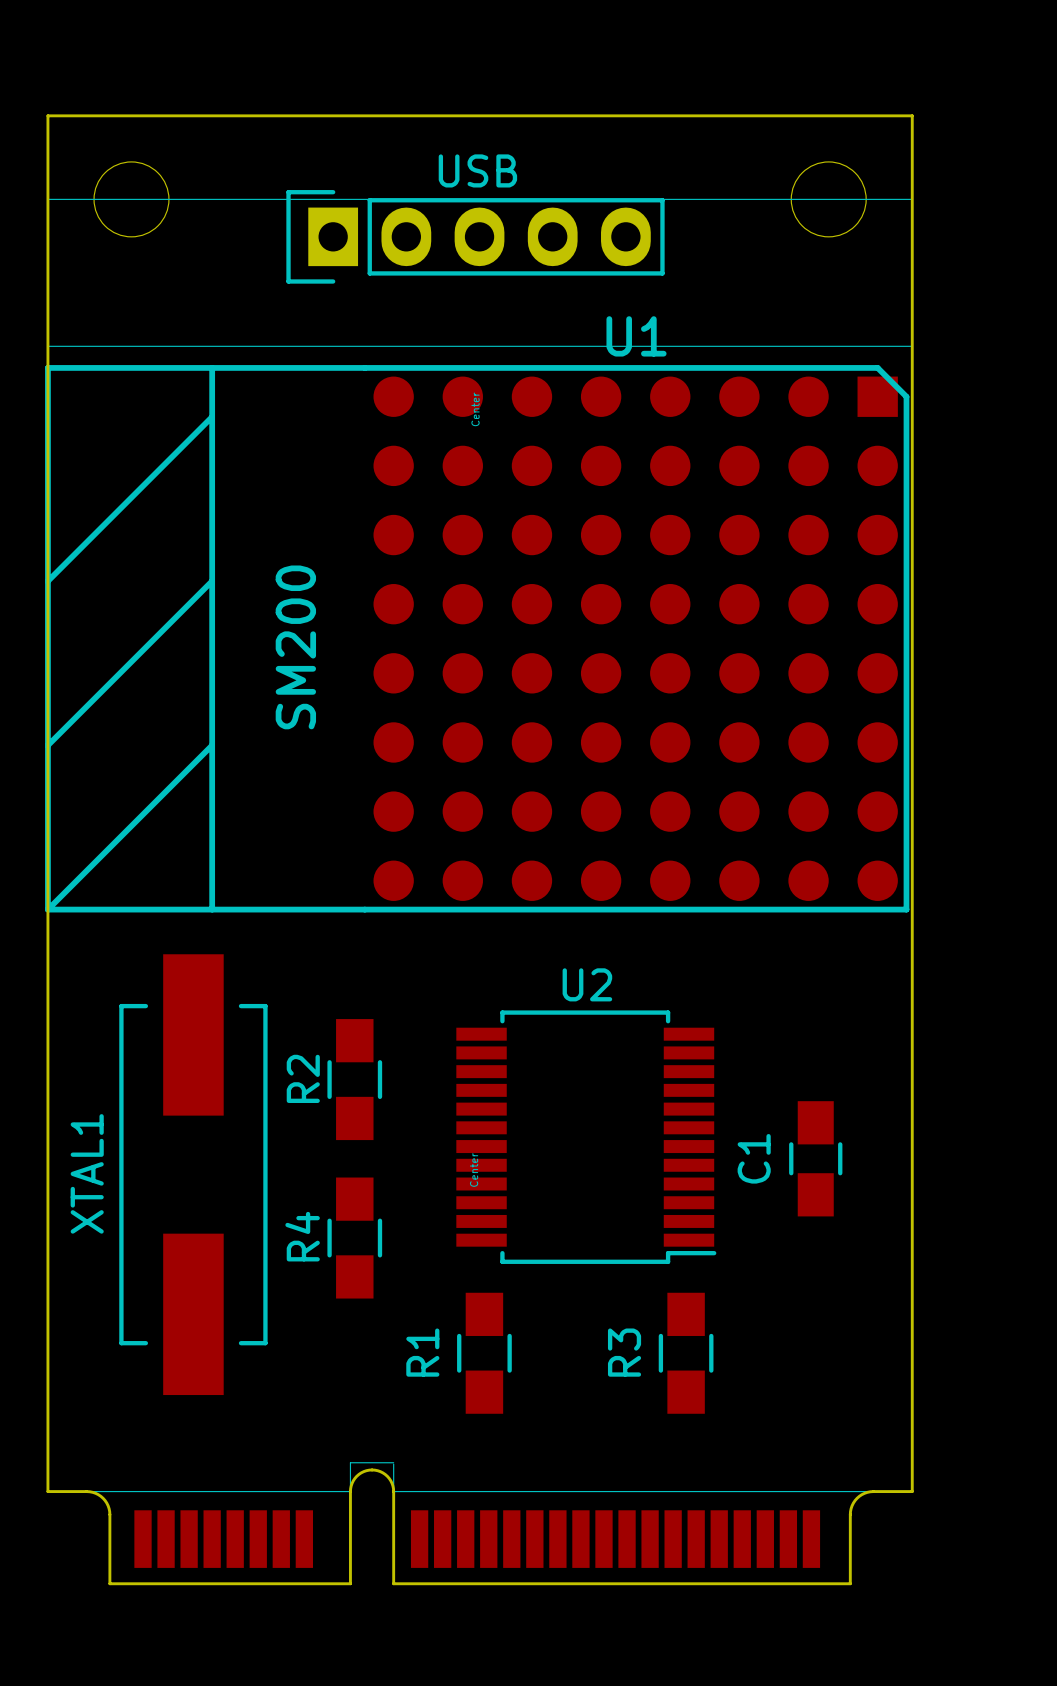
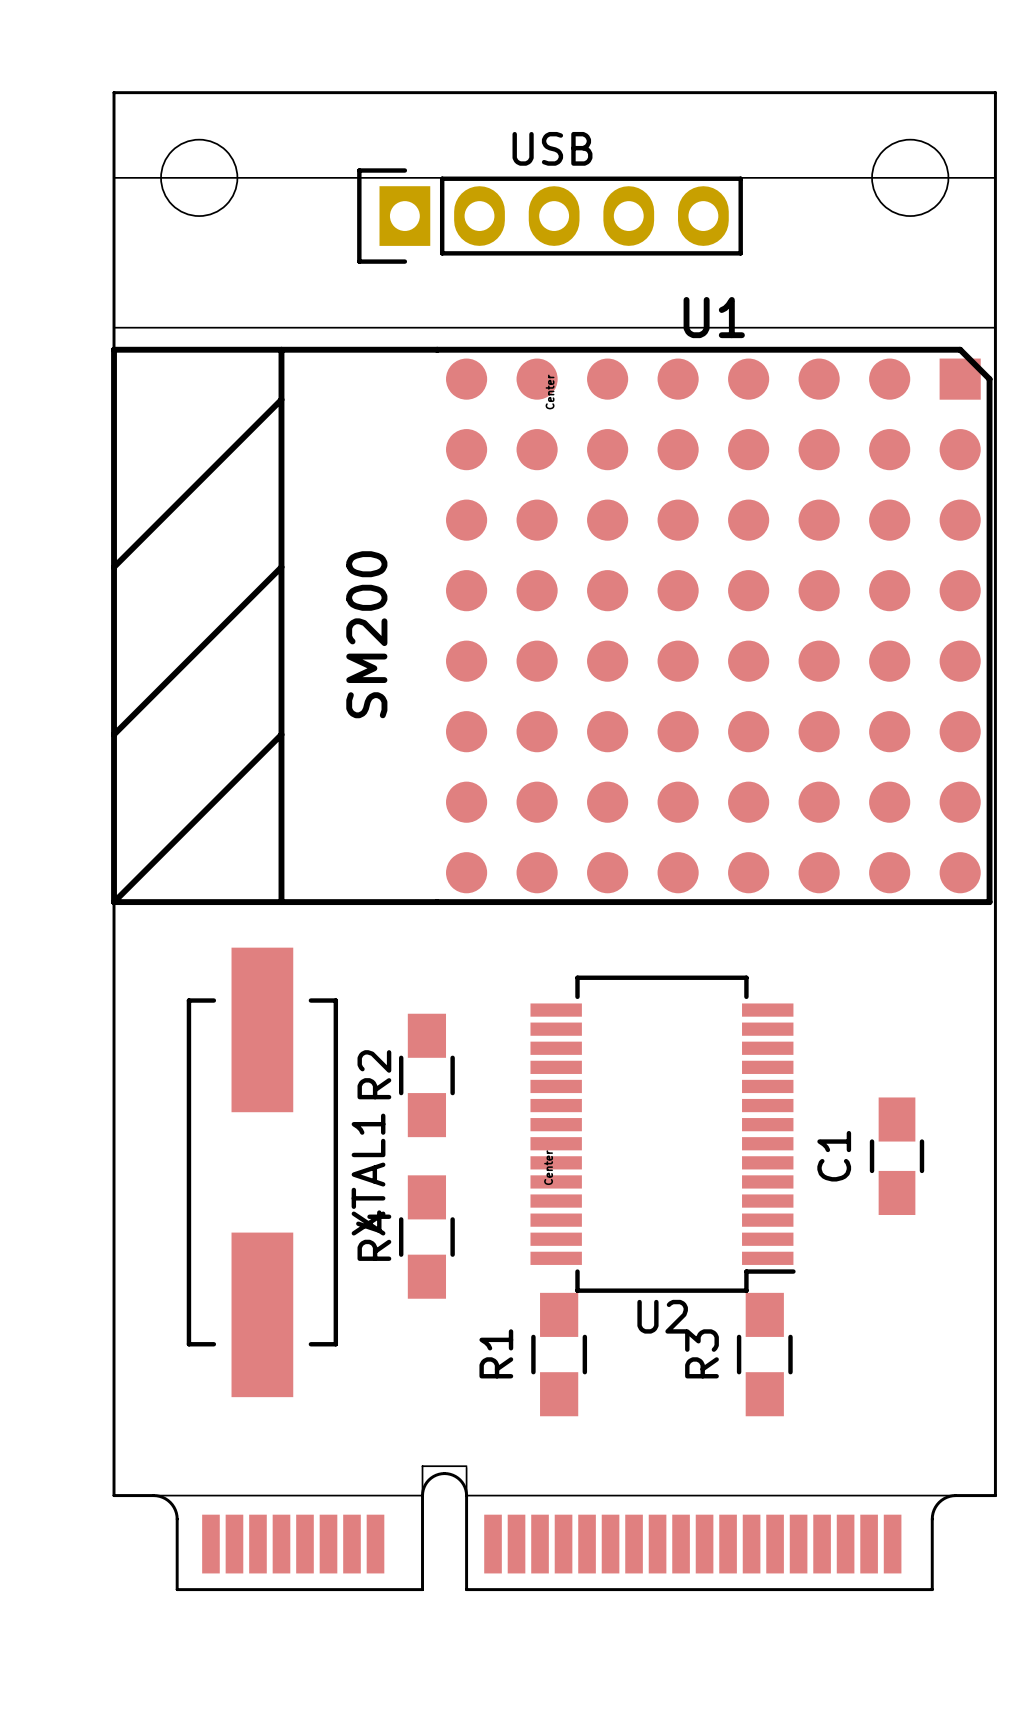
U2 name position: U2 (587, 984) -> U2 (662, 1316)
U2 footprint: [456, 1010, 717, 1264] -> [530, 975, 796, 1293]
XTAL1 name position: XTAL1 (87, 1173) -> XTAL1 (368, 1174)

